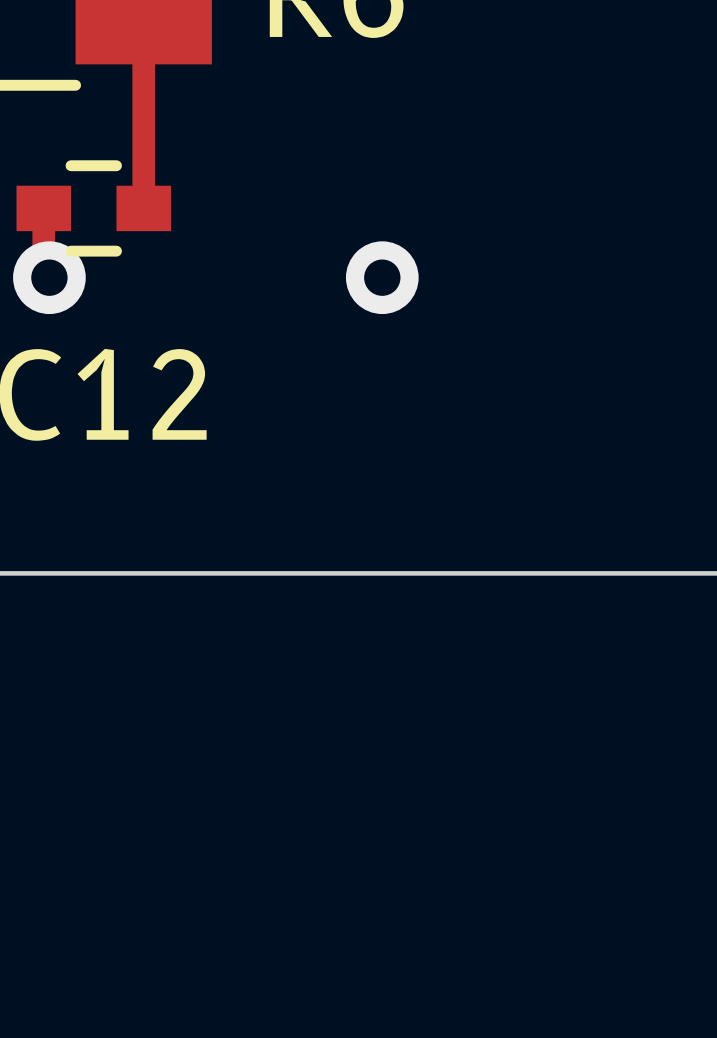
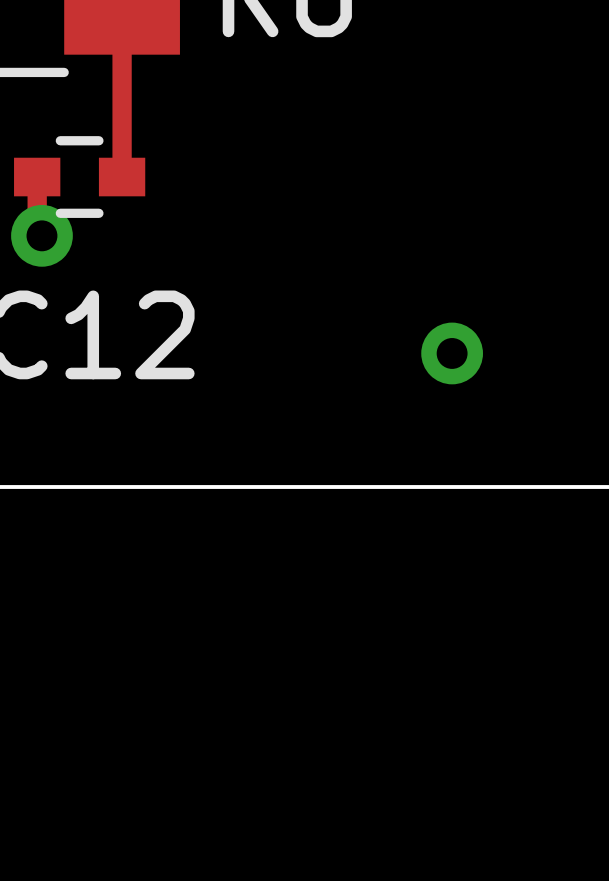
via position: (382, 277) -> (452, 353)

